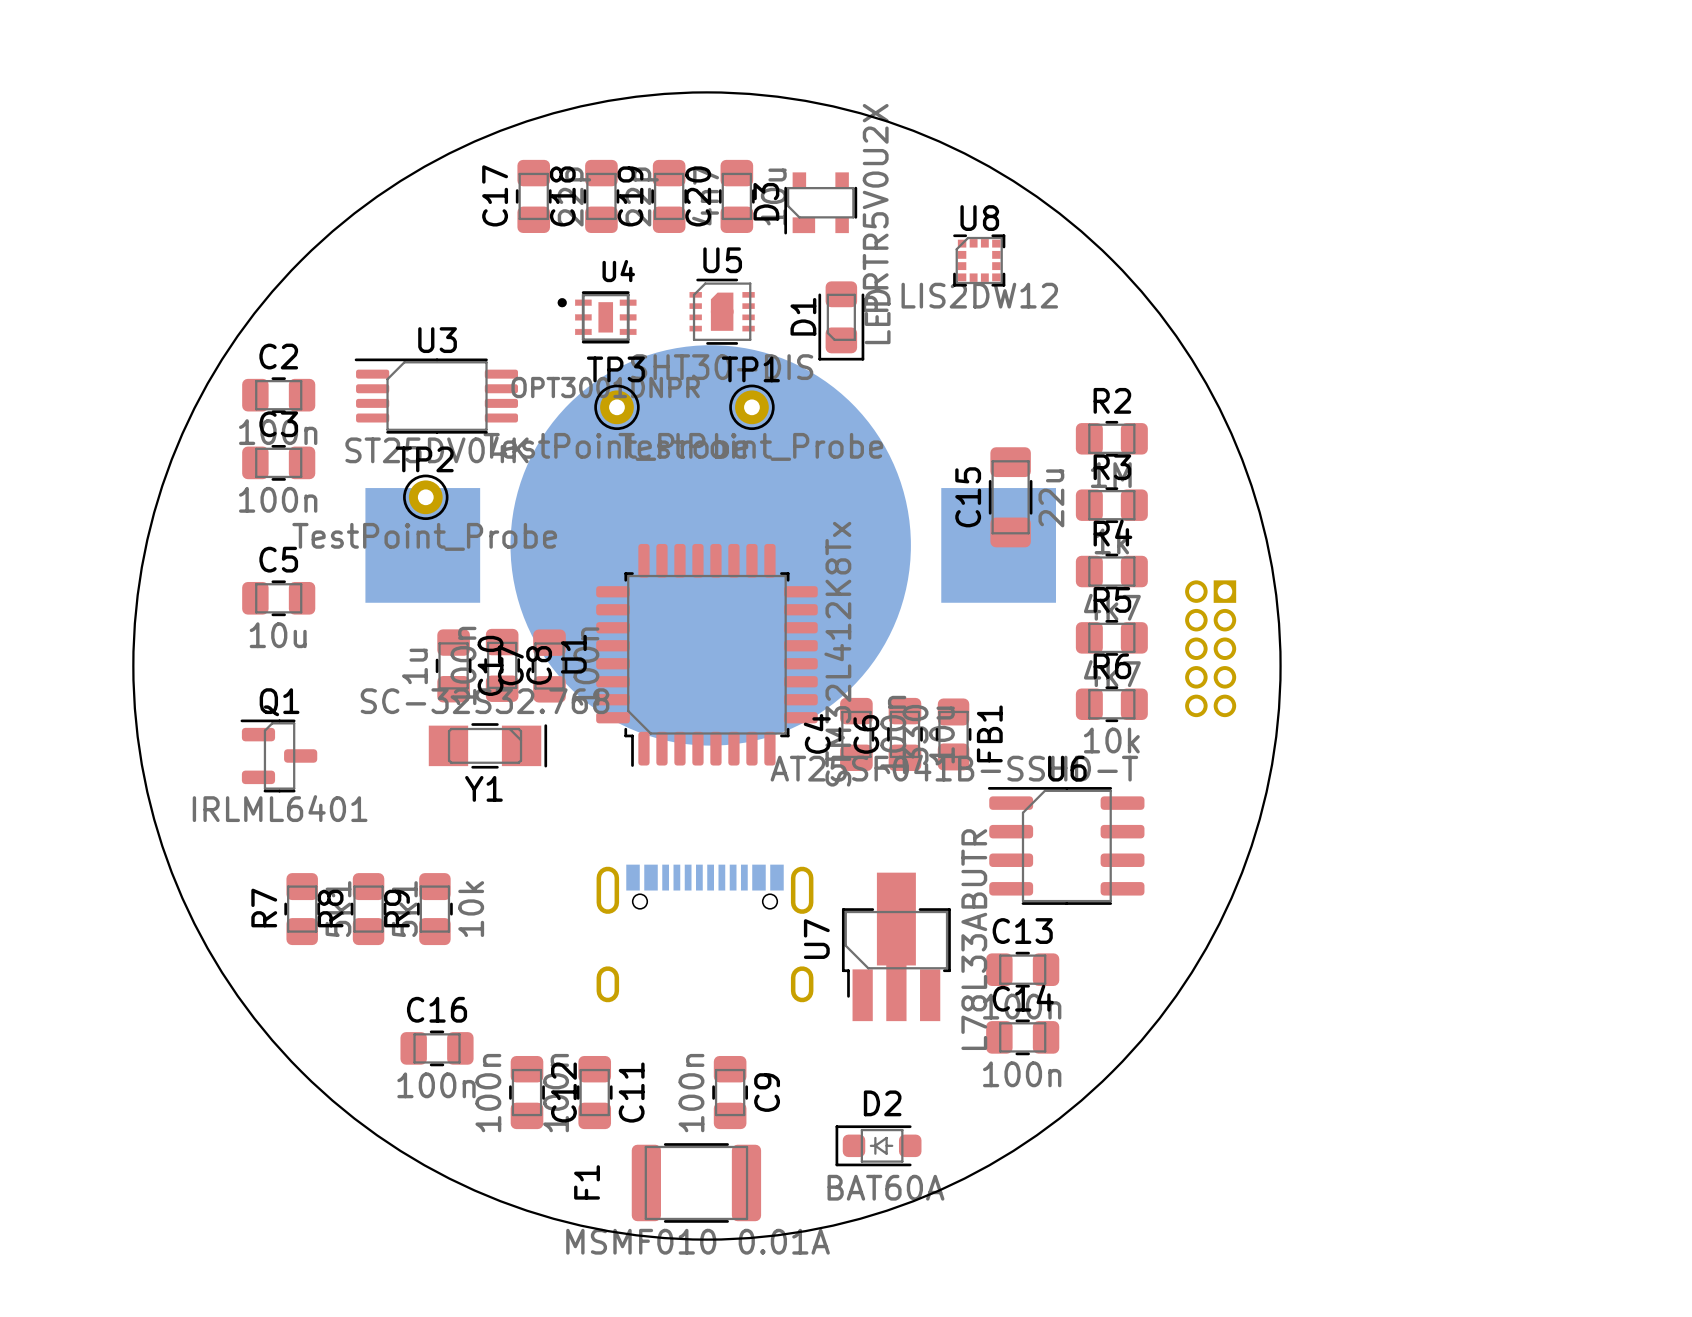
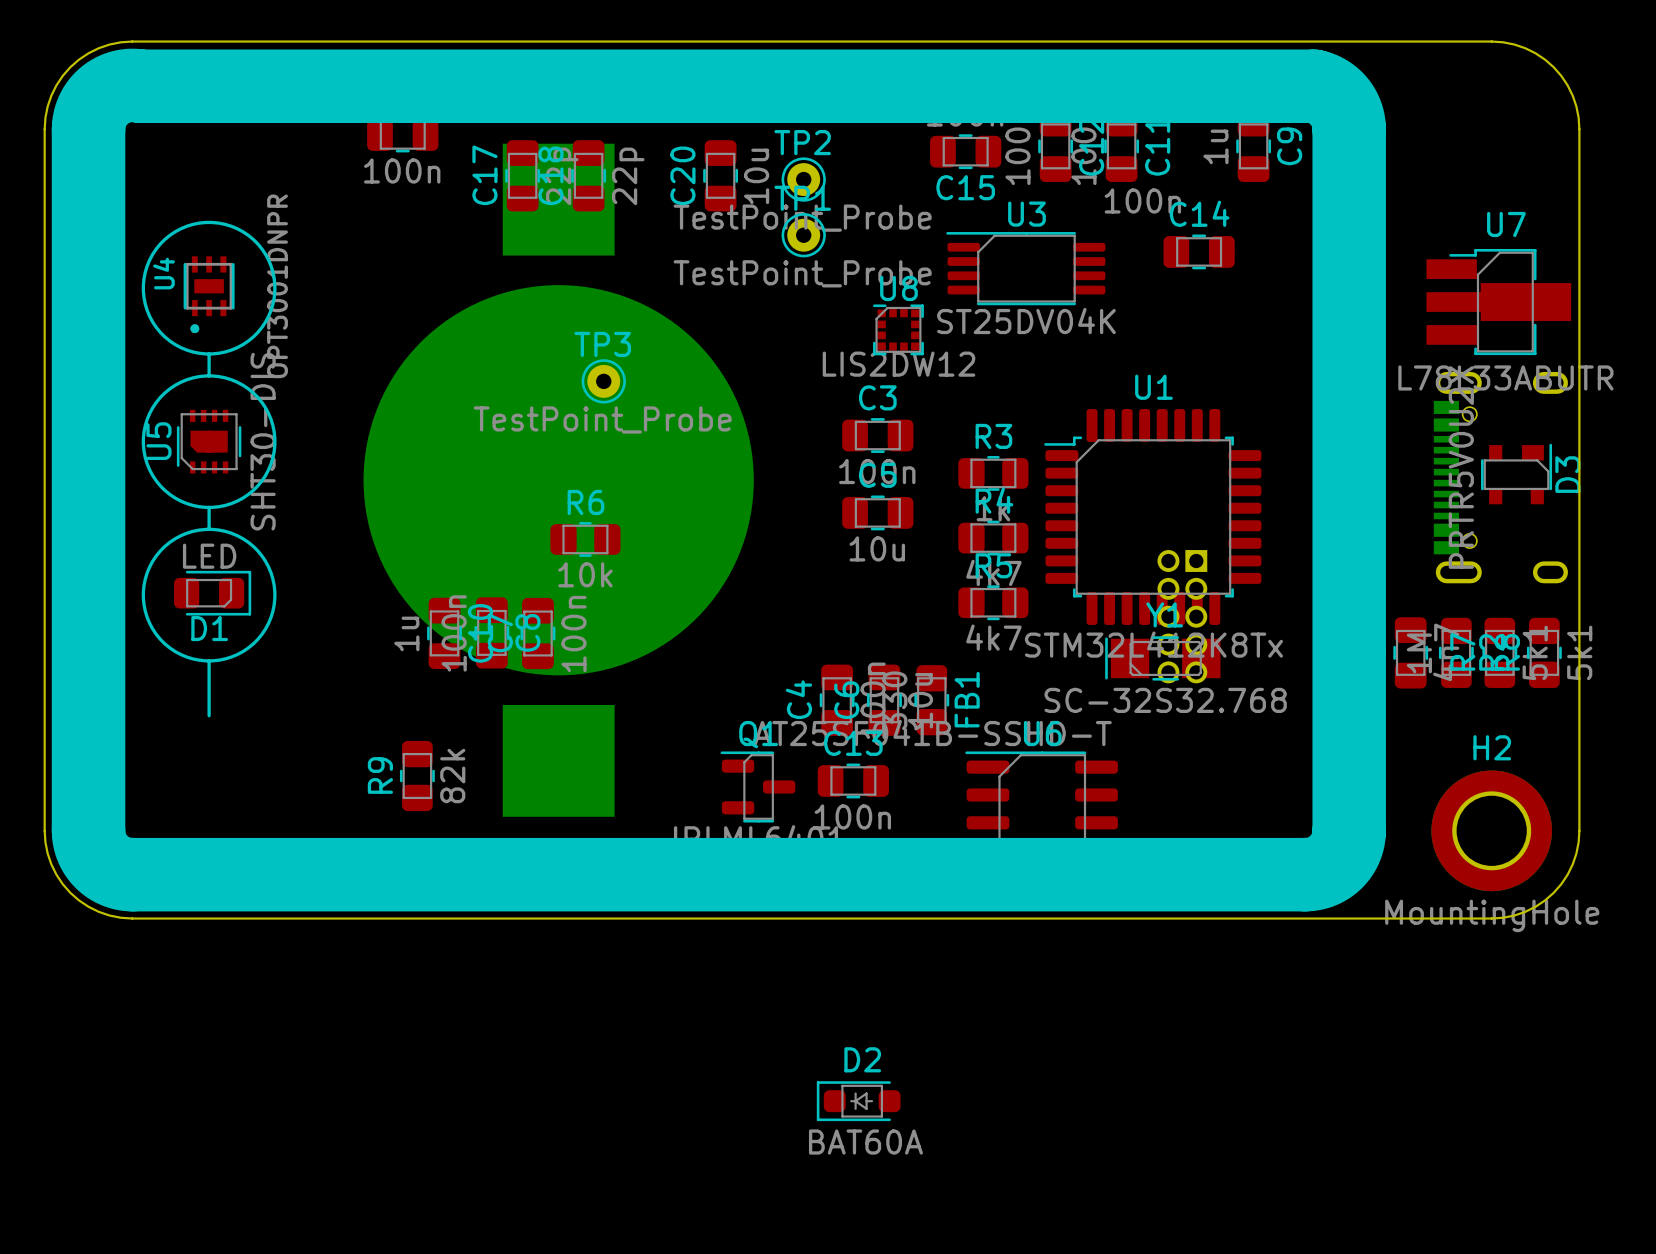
board edge: none -> (132, 41) (1491, 41) (1514, 44) (1535, 53) (1553, 67) (1567, 85) (1576, 106) (1579, 129) (1579, 830) (1576, 853) (1567, 874) (1553, 892) (1535, 906) (1514, 915) (1491, 918) (132, 918) (109, 915) (88, 906) (70, 892) (56, 874) (47, 853) (44, 830) (44, 129) (51, 95) (70, 67) (98, 48) (132, 41)
round board edge: [132, 91, 1282, 1241] -> none
line: none -> (140, 86) (1313, 86) (1327, 91) (1342, 105) (1346, 114) (1349, 129) (1349, 830) (1346, 845) (1342, 854) (1336, 861) (1324, 870) (1305, 874) (132, 874) (122, 873) (109, 867) (101, 861) (92, 849) (88, 830) (88, 129) (94, 108) (104, 95) (124, 86) (140, 86)
C19 position: (669, 196) -> (1410, 652)
D3 rotation: 0° (820, 203) -> 180° (1516, 474)
D3 position: (820, 203) -> (1516, 474)
drawing: none -> [141, 220, 277, 663]
U8 position: (979, 260) -> (898, 329)
U5 rotation: 0° (722, 311) -> 90° counterclockwise (209, 441)
U5 position: (722, 311) -> (209, 441)
U4 rotation: 0° (597, 317) -> 90° counterclockwise (209, 294)
U4 position: (597, 317) -> (209, 294)
D1 rotation: 0° (841, 320) -> 90° counterclockwise (212, 593)
D1 position: (841, 320) -> (212, 593)
line: none -> (209, 353) (209, 375)
C2 position: (278, 395) -> (402, 134)
U3 position: (436, 396) -> (1025, 268)
TP1 position: (751, 407) -> (803, 235)
R2 rotation: 0° (1111, 438) -> 90° clockwise (1456, 652)
R2 position: (1111, 438) -> (1456, 652)
C15 footprint: [988, 447, 1033, 548] -> [930, 134, 1002, 170]
C3 position: (278, 462) -> (877, 435)
TP2 position: (425, 497) -> (803, 179)
C15 name position: C15 (968, 497) -> C15 (965, 187)
C15 value: 22u (1051, 498) -> 100n (965, 114)
R3 position: (1111, 505) -> (993, 473)
part: none -> (1500, 477)
line: none -> (209, 507) (209, 529)
part rotation: 0° (710, 545) -> 90° clockwise (558, 480)
R4 position: (1111, 571) -> (993, 538)
C5 position: (278, 598) -> (877, 512)
R5 position: (1111, 637) -> (993, 602)
U1 rotation: 0° (706, 655) -> 90° clockwise (1152, 517)
U1 position: (706, 655) -> (1152, 517)
line: none -> (209, 660) (209, 715)
R6 position: (1111, 704) -> (585, 539)
Y1 rotation: 0° (487, 745) -> 180° (1162, 658)
Y1 position: (487, 745) -> (1162, 658)
Q1 position: (278, 755) -> (757, 786)
H2: none -> MountingHole (1491, 830)
R7 position: (302, 909) -> (1499, 652)
R8 position: (368, 909) -> (1544, 652)
R9 position: (434, 909) -> (417, 776)
R9 value: 10k (471, 909) -> 82k (452, 776)
part: (704, 933) -> none
U7 rotation: 0° (896, 946) -> 90° clockwise (1498, 302)
U7 position: (896, 946) -> (1498, 302)
C13 position: (1022, 969) -> (853, 780)
C14 position: (1022, 1037) -> (1199, 251)
C16: 100n (437, 1048) -> none
C14 value position: 100n (1022, 1074) -> 100n (1142, 200)
C12 position: (527, 1092) -> (1055, 146)
C11 position: (594, 1092) -> (1121, 146)
C9 position: (730, 1092) -> (1253, 146)
C9 value: 100n (691, 1093) -> 1u (1215, 146)
F1: MSMF010 0.01A (696, 1182) -> none

